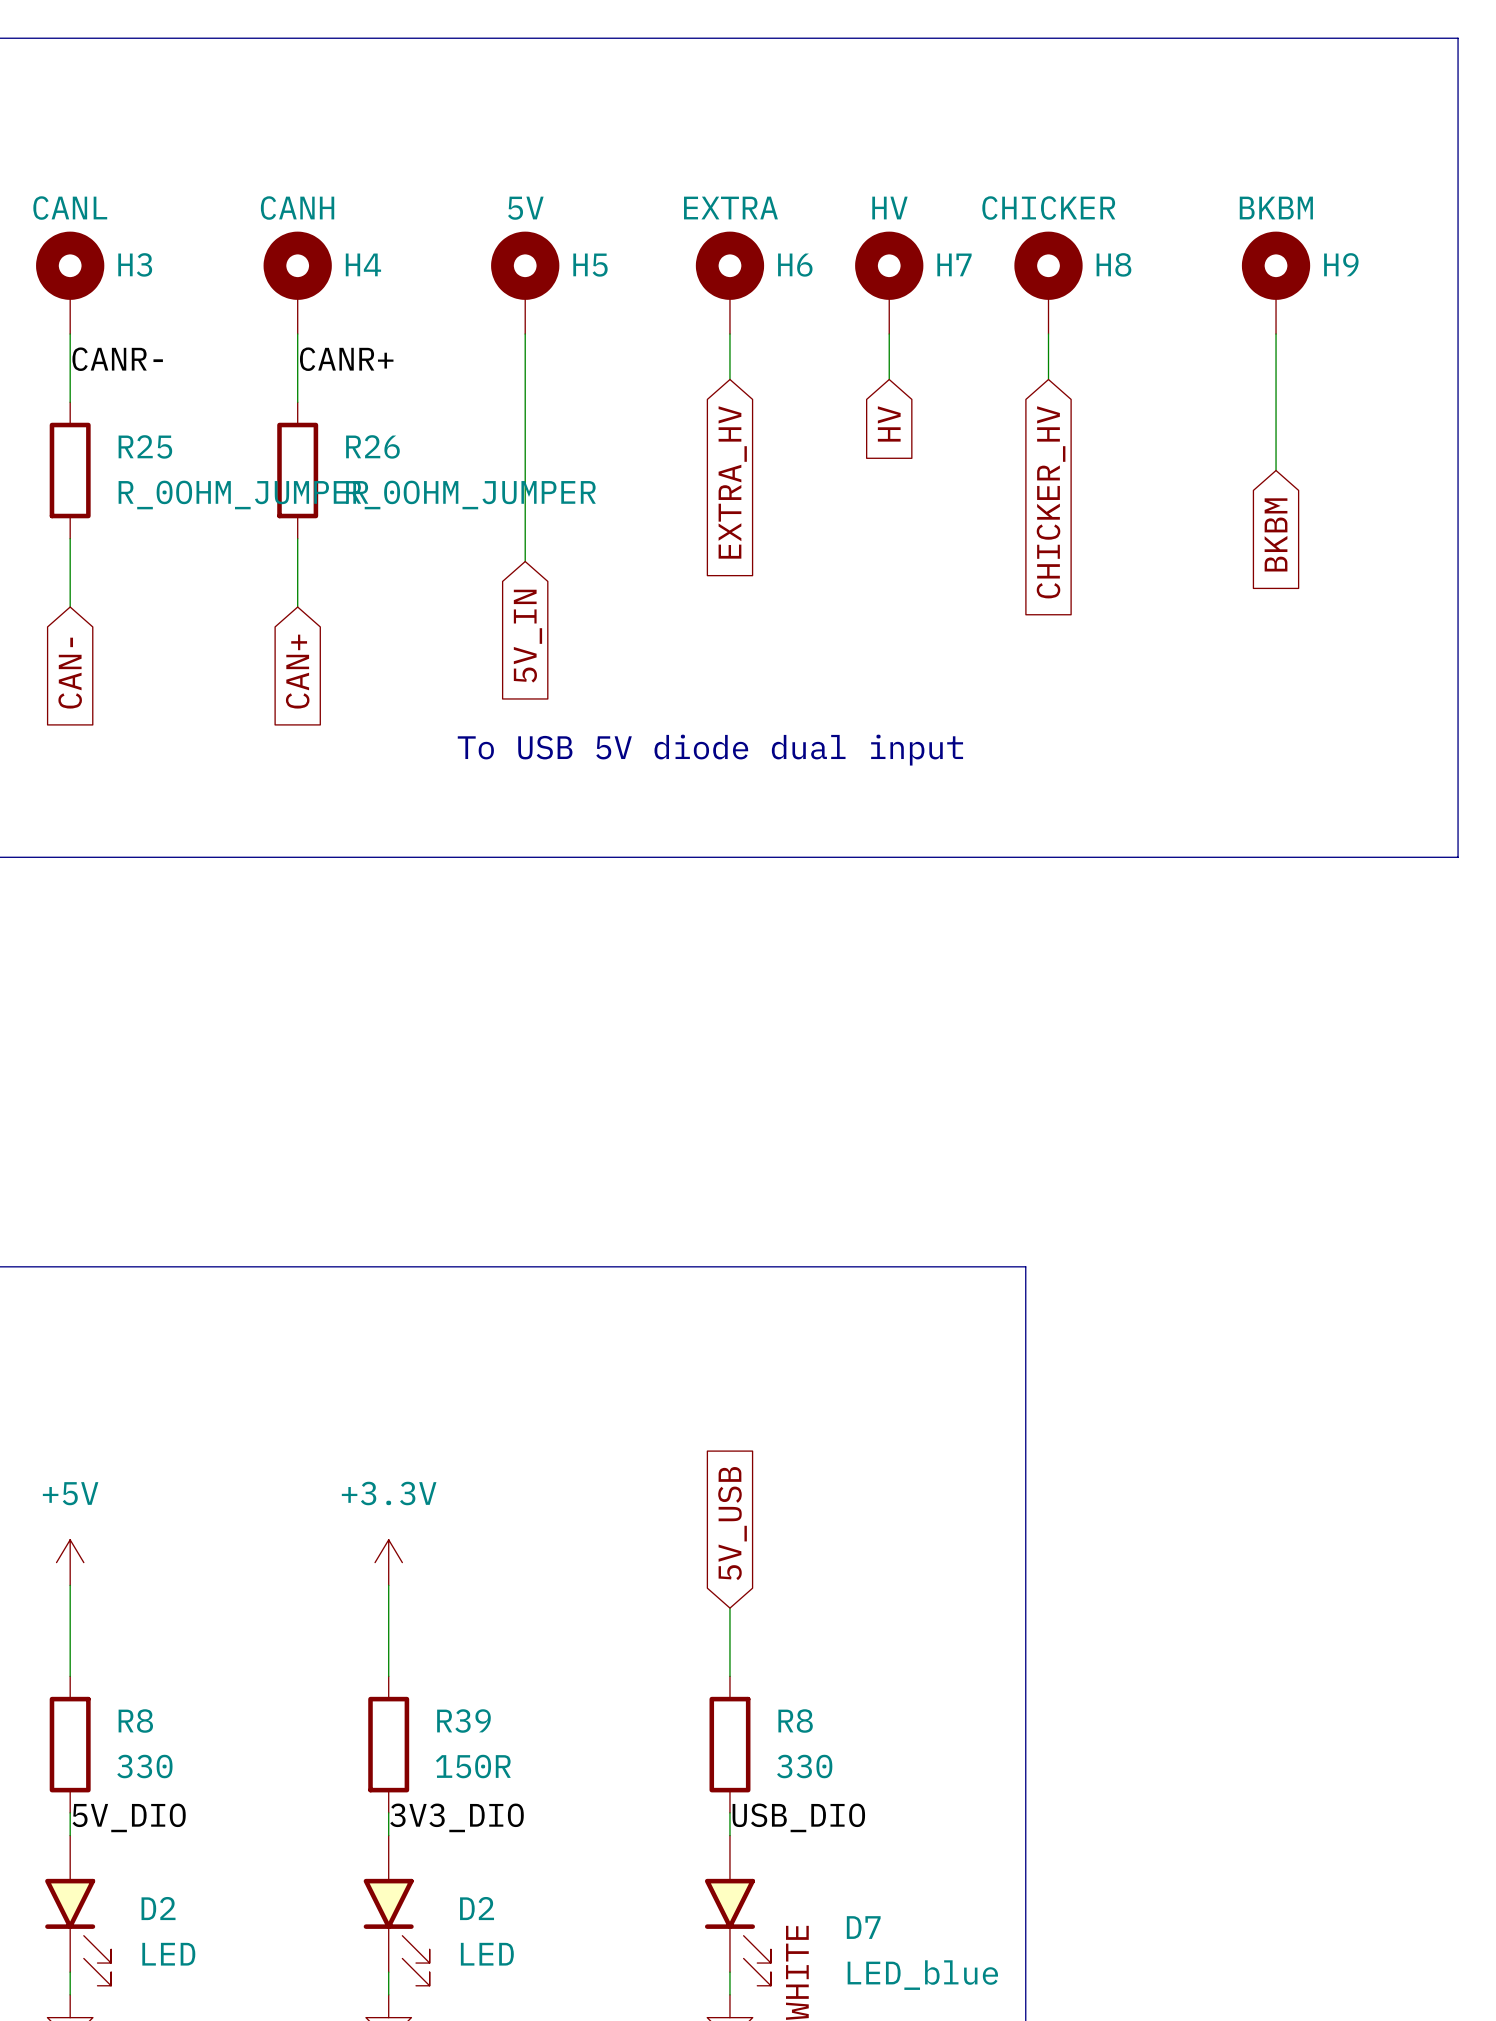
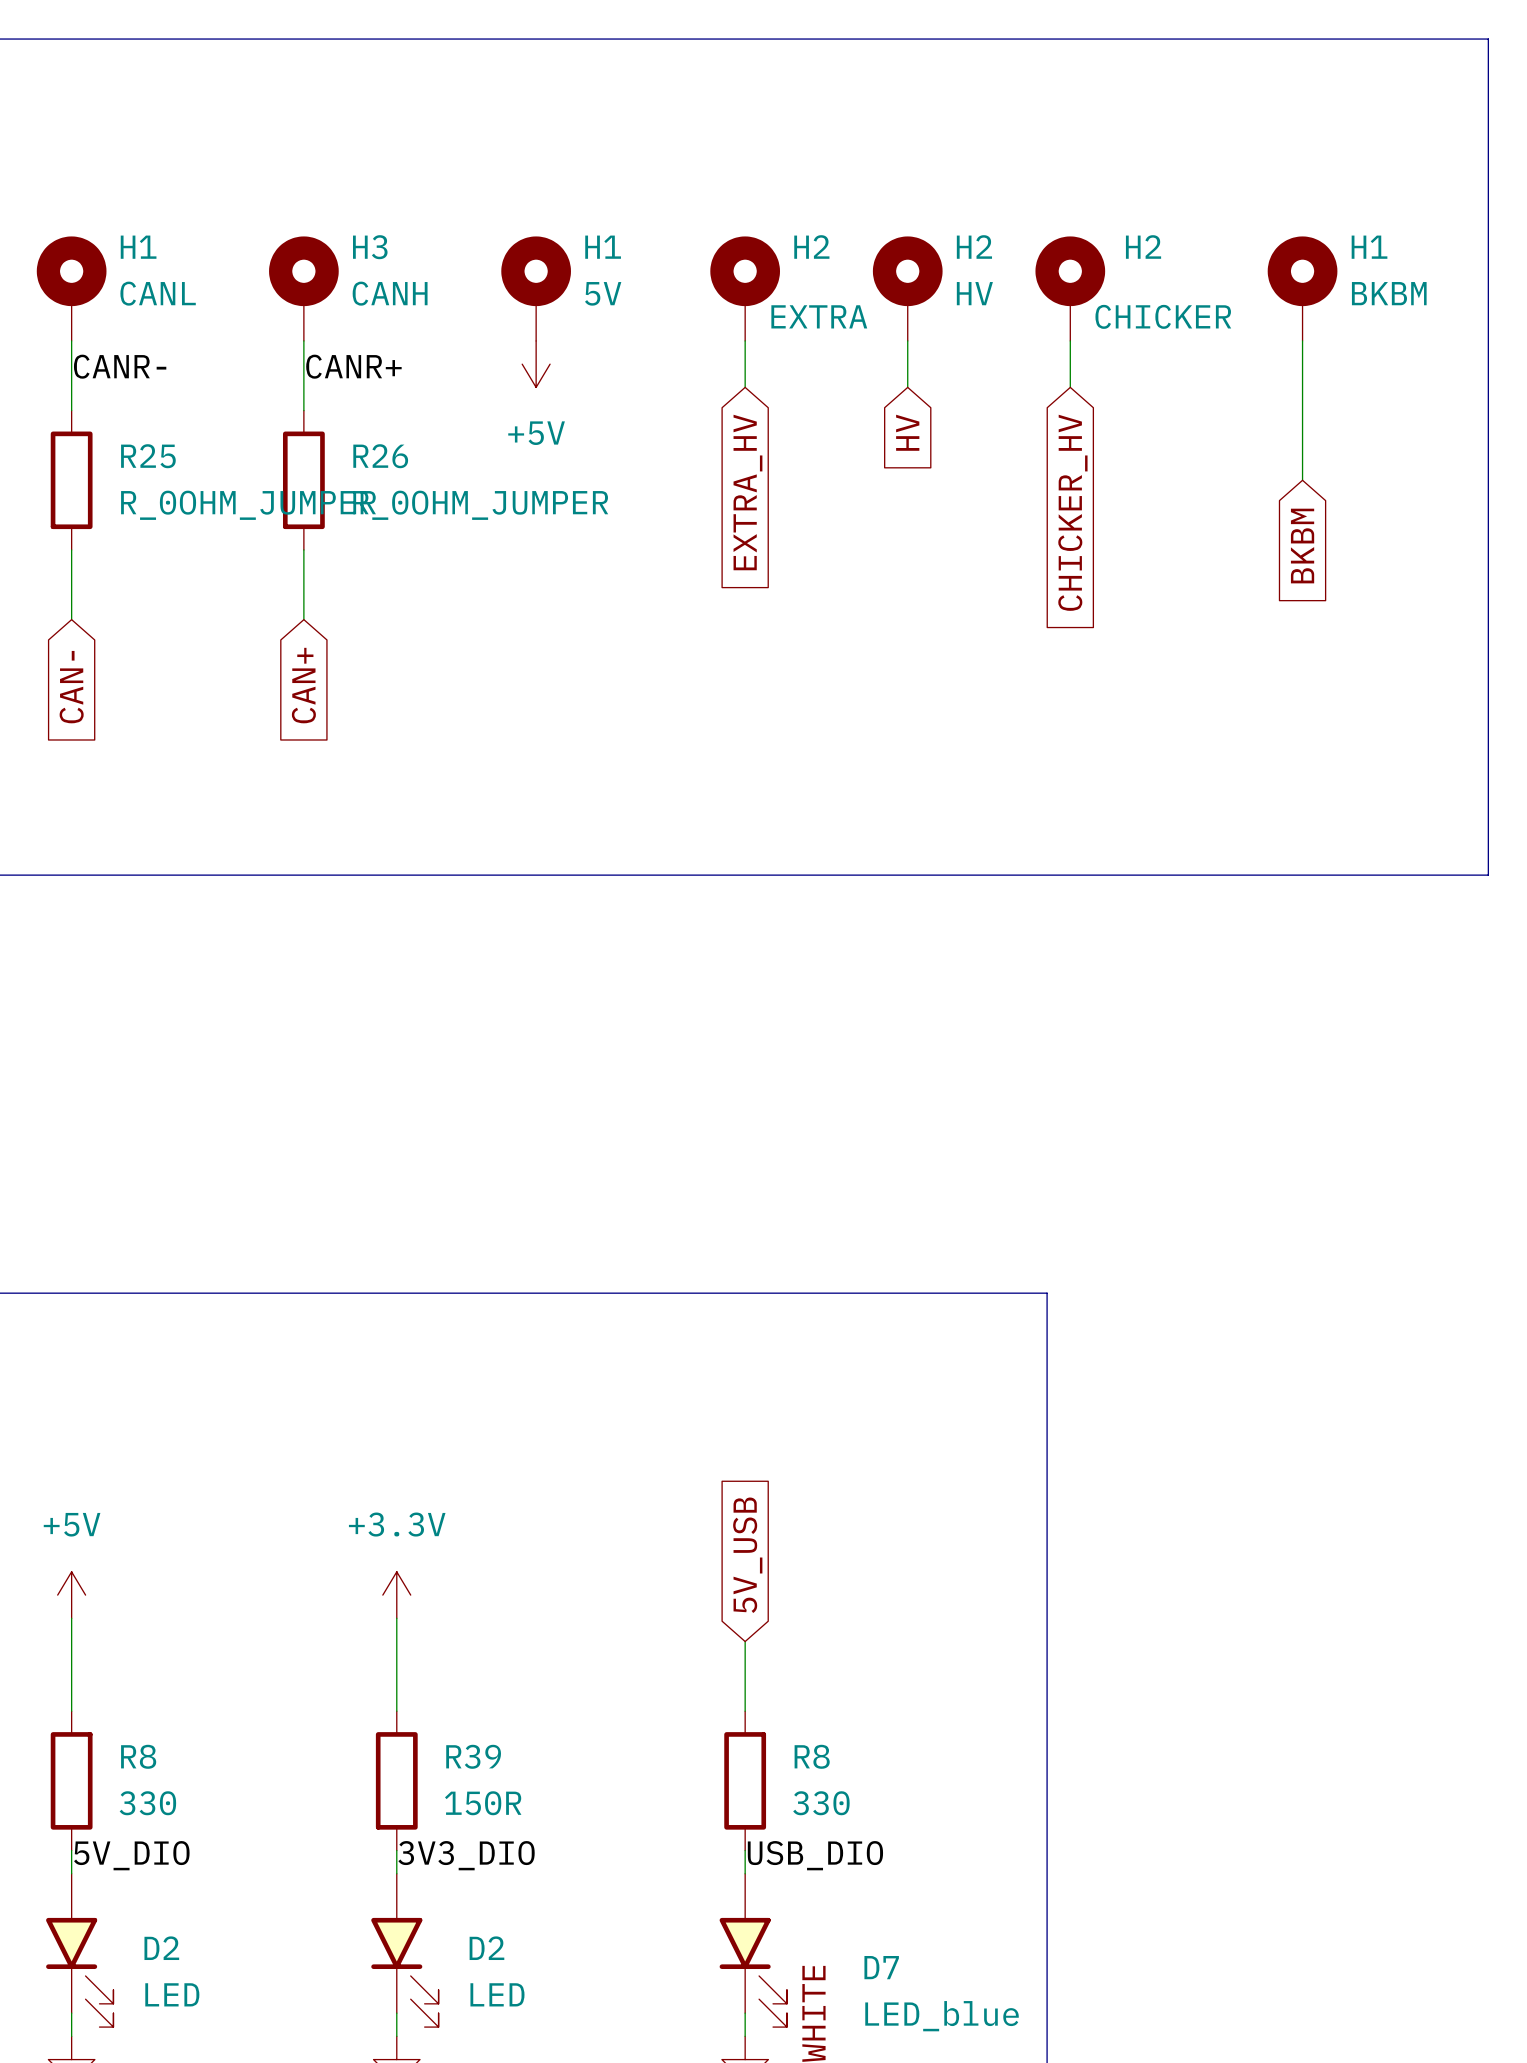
H3 value position: CANL (70, 208) -> CANL (158, 293)
H4 value position: CANH (297, 208) -> CANH (390, 293)
H5 value position: 5V (525, 208) -> 5V (603, 293)
H6 value position: EXTRA (730, 208) -> EXTRA (819, 316)
H7 value position: HV (889, 208) -> HV (974, 293)
H8 value position: CHICKER (1048, 208) -> CHICKER (1163, 316)
H9 value position: BKBM (1276, 208) -> BKBM (1389, 293)
H3 name: H3 (135, 264) -> H1 (138, 247)
H4 name: H4 (363, 264) -> H3 (370, 247)
H7 name: H7 (954, 264) -> H2 (974, 246)
H8 name: H8 (1113, 264) -> H2 (1143, 246)
H9 name: H9 (1341, 264) -> H1 (1369, 247)
H5 name: H5 (590, 265) -> H1 (603, 247)
H6 name: H6 (795, 265) -> H2 (811, 246)
wire: (525, 334) (525, 561) -> none
power symbol: none -> +5V (536, 364)
global label: 5V_IN (527, 636) -> none
text: To USB 5V diode dual input (710, 750) -> none

